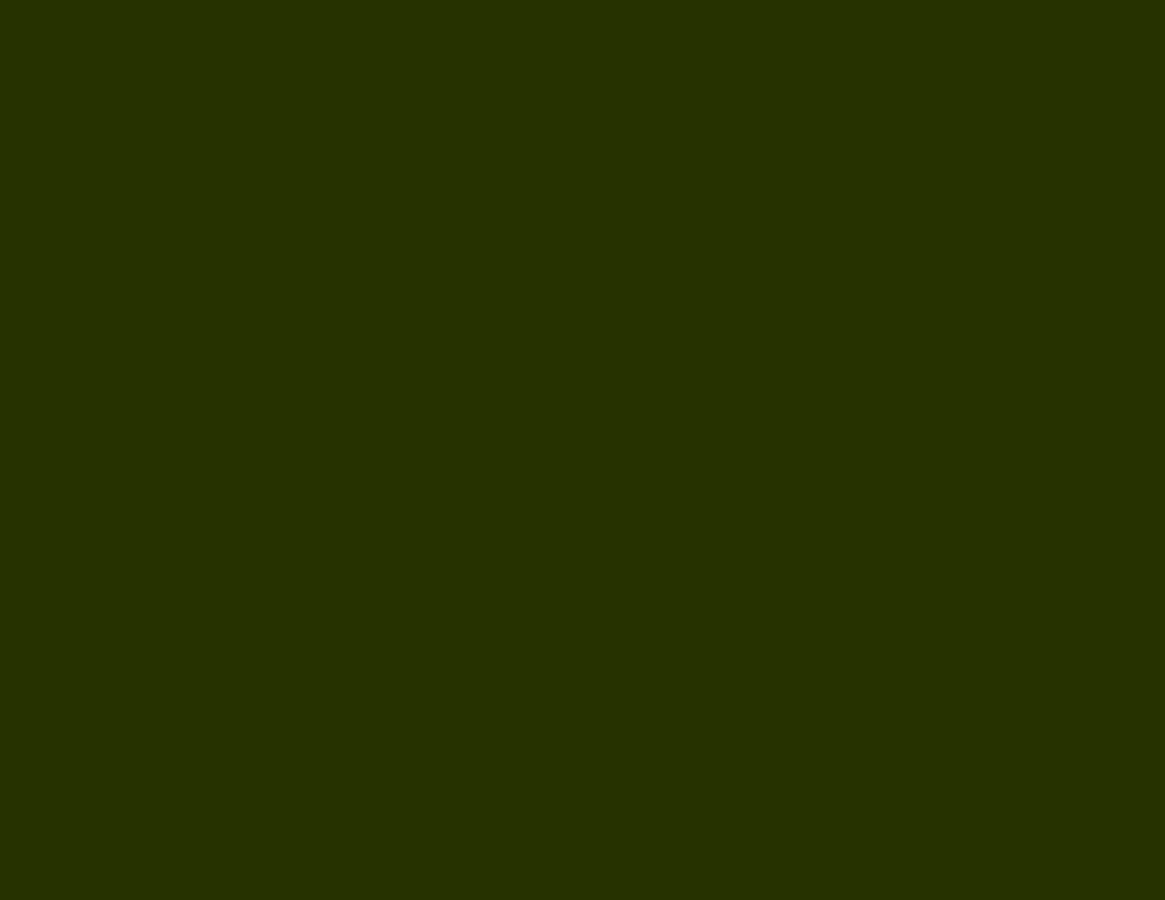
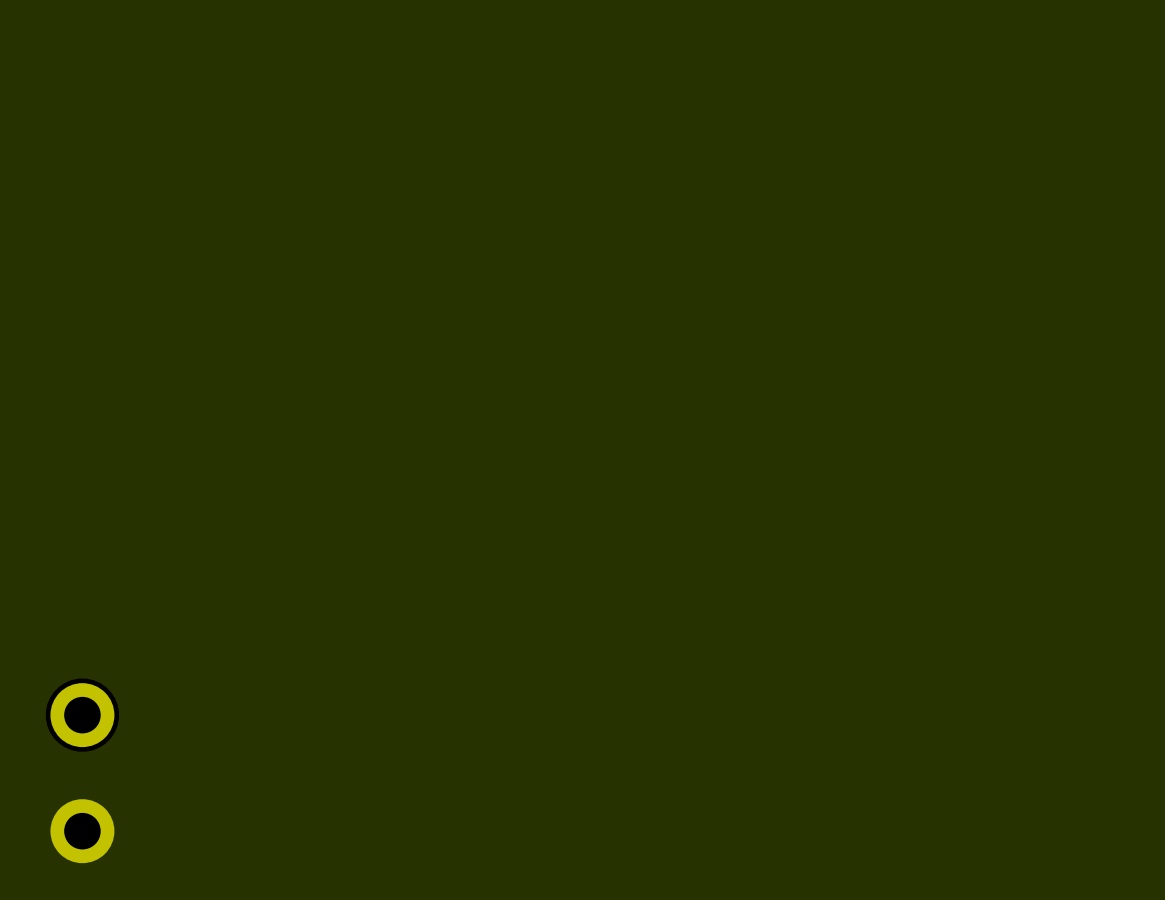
part: none -> (82, 773)

